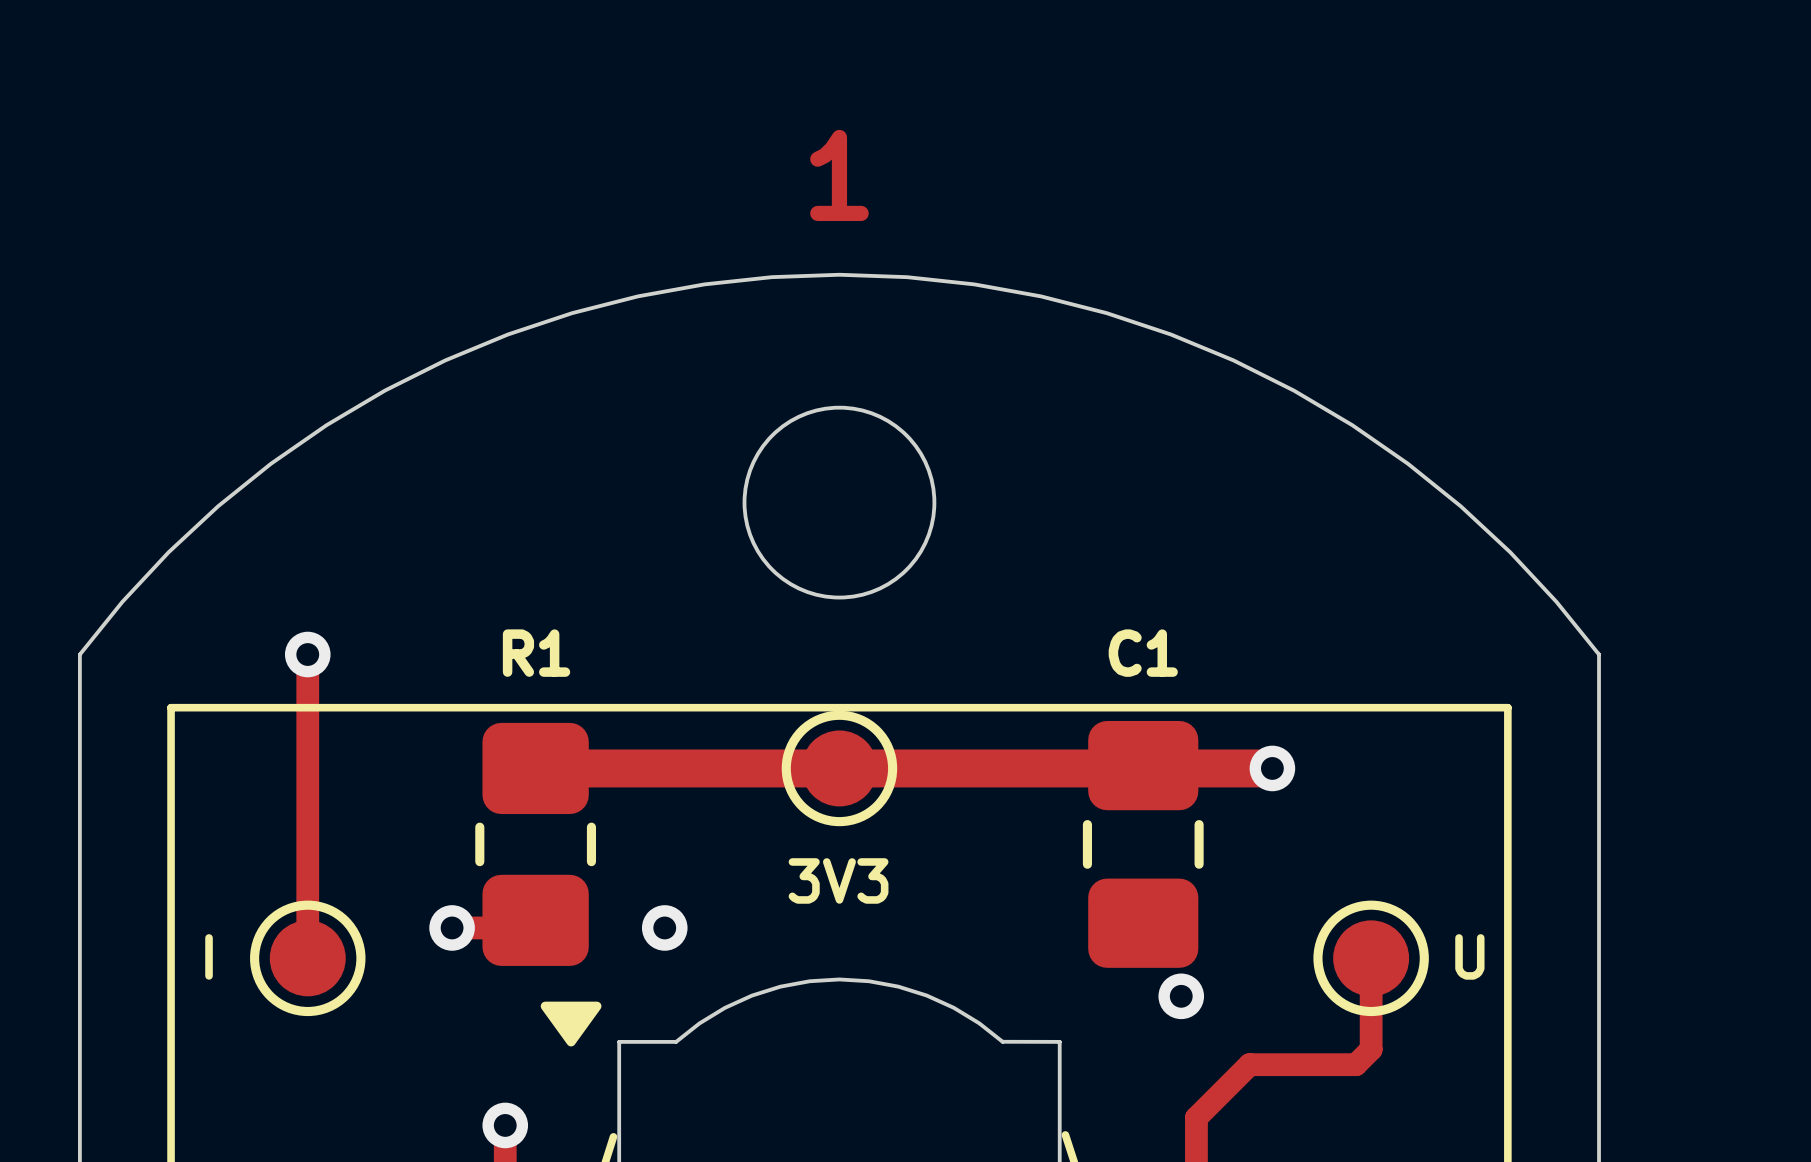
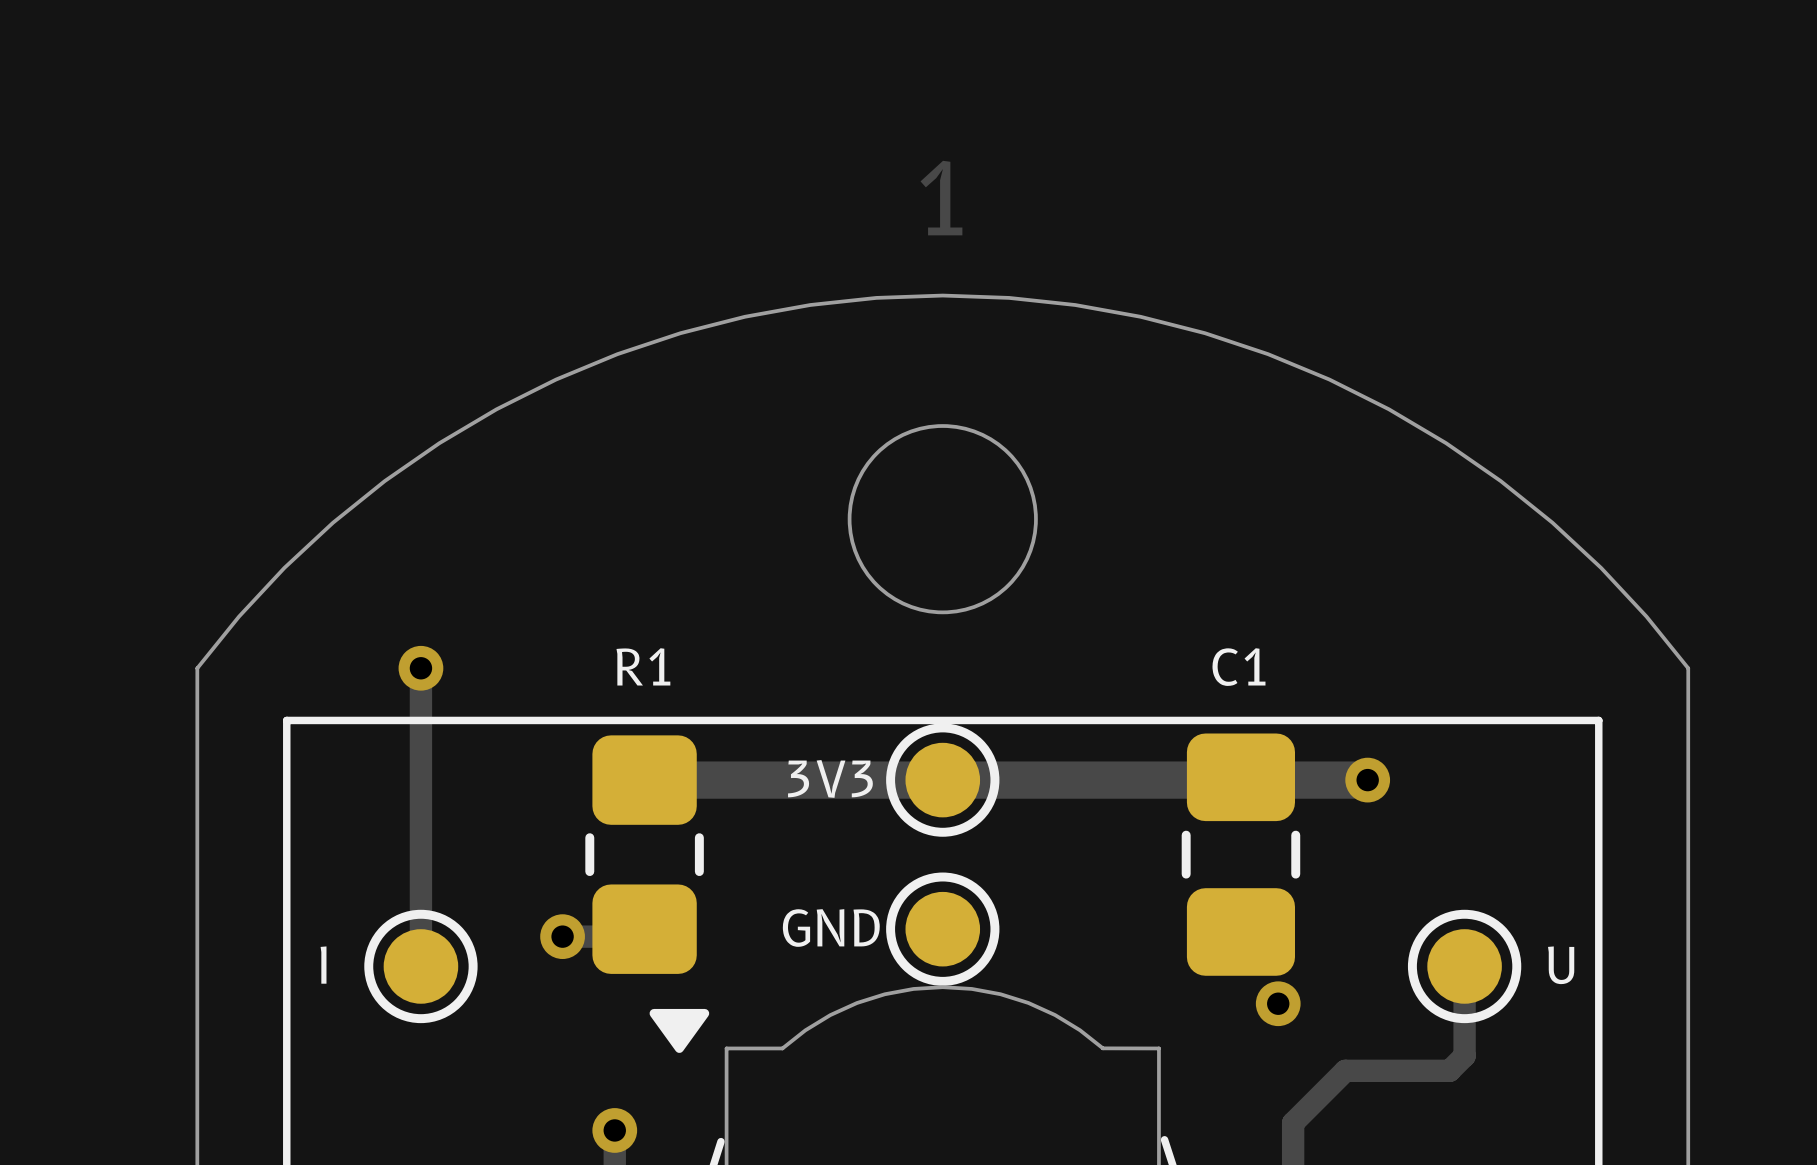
text position: 3V3 (838, 880) -> 3V3 (830, 778)
text: none -> GND (831, 928)
part: none -> (942, 929)
via: (664, 927) -> none

